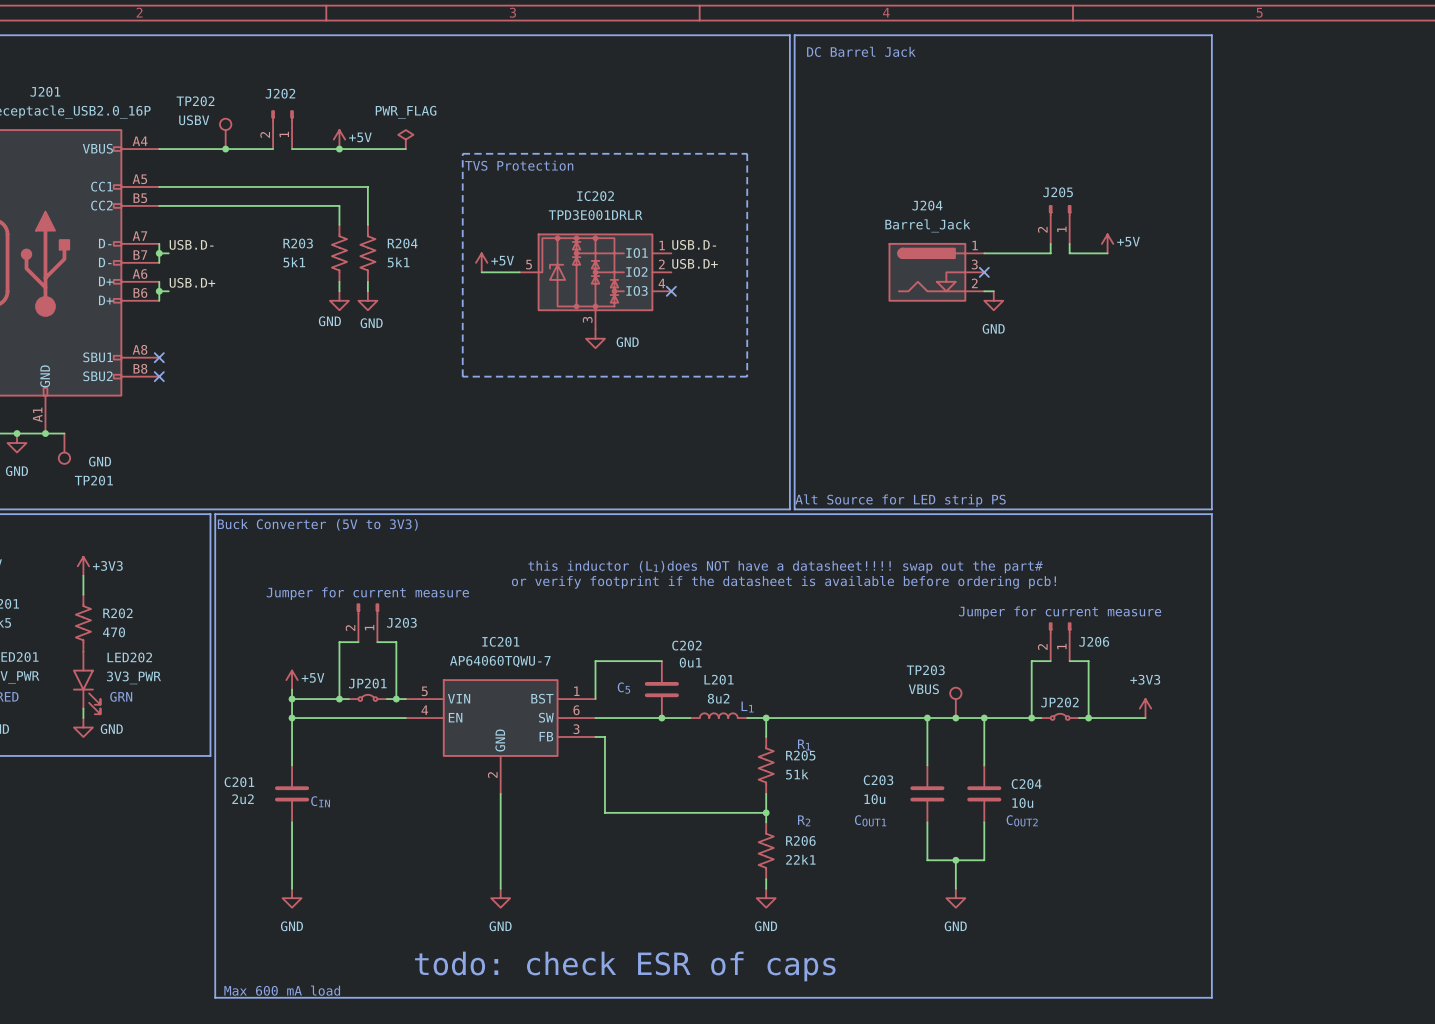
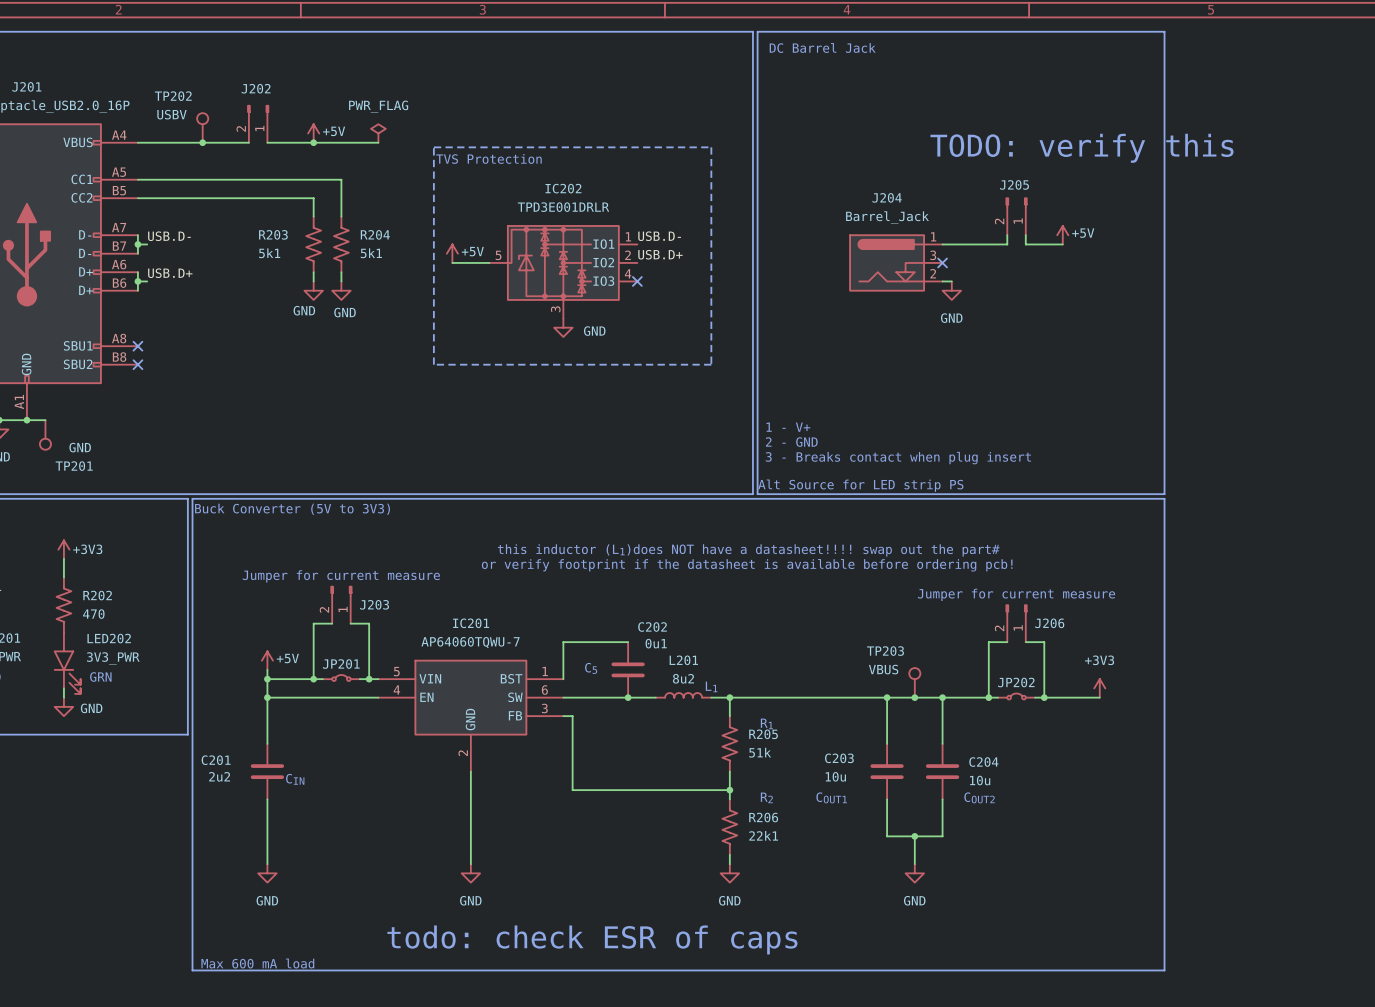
text: none -> TODO: verify this (1081, 148)
text: none -> 1 - V+ (788, 427)
text: none -> 2 - GND (791, 442)
text: none -> 3 - Breaks contact when plug insert (898, 458)

